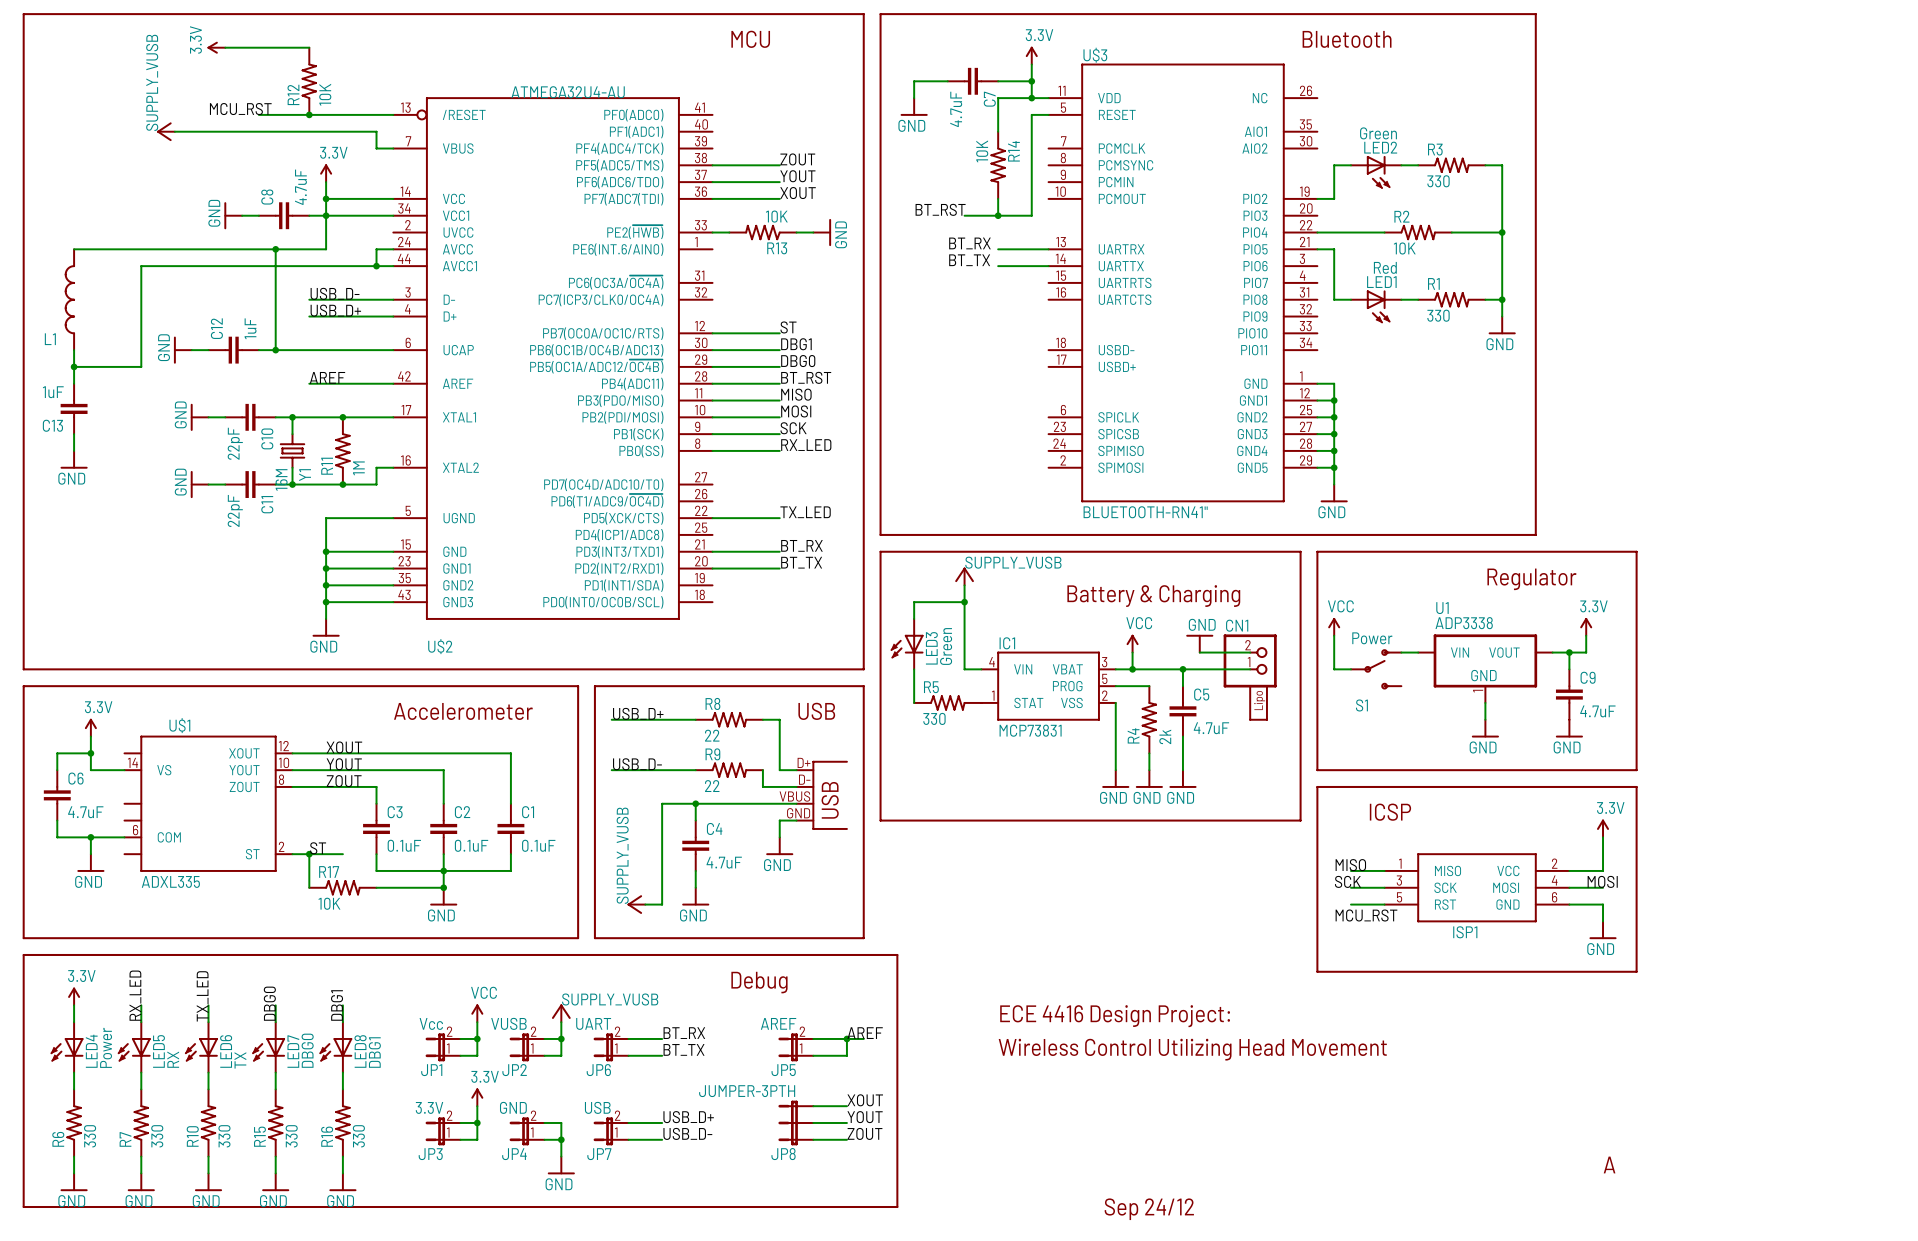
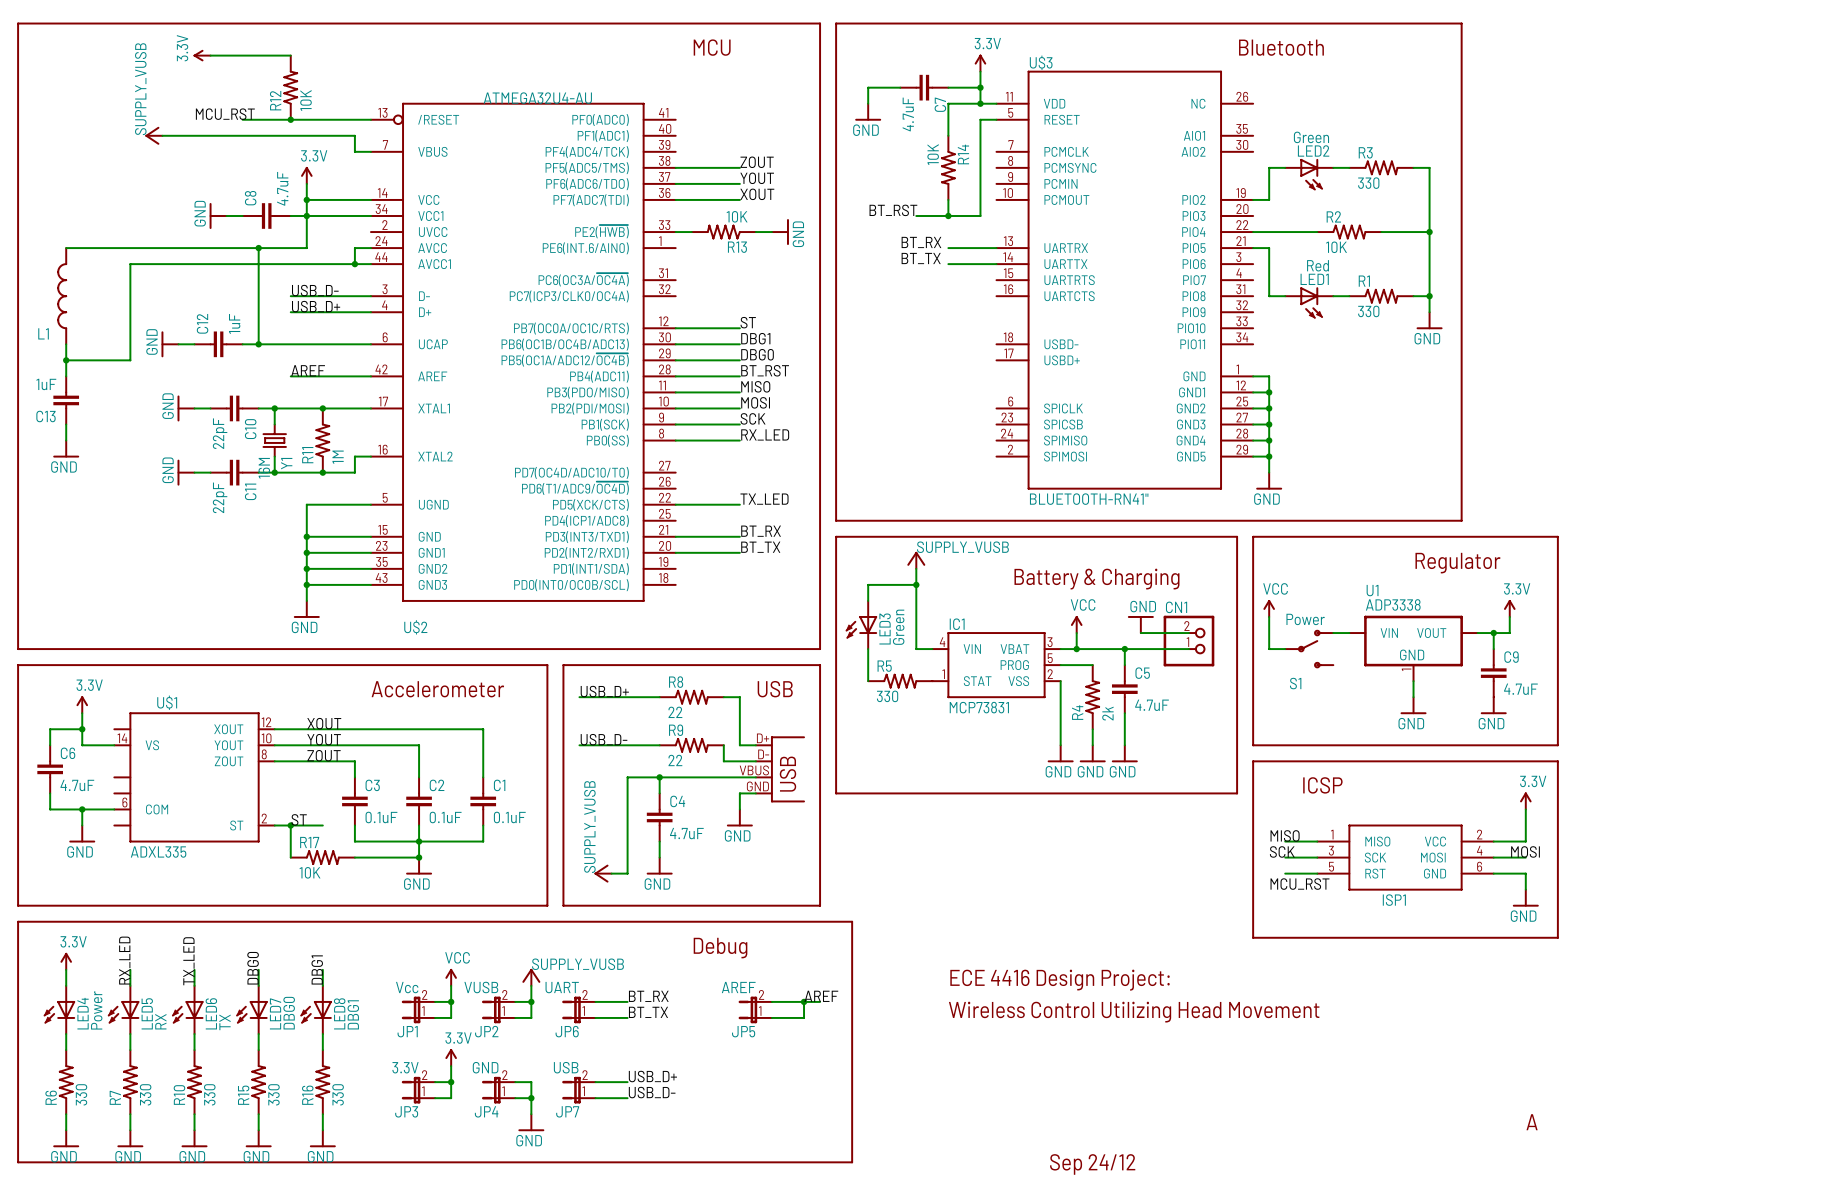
part: (1258, 702) -> none
label: XOUT (865, 1100) -> none
wire: (813, 1106) (846, 1106) -> none
label: YOUT (865, 1117) -> none
JP8: JUMPER-3PTH (795, 1122) -> none
wire: (813, 1122) (846, 1122) -> none
label: ZOUT (865, 1133) -> none
wire: (813, 1139) (846, 1139) -> none

